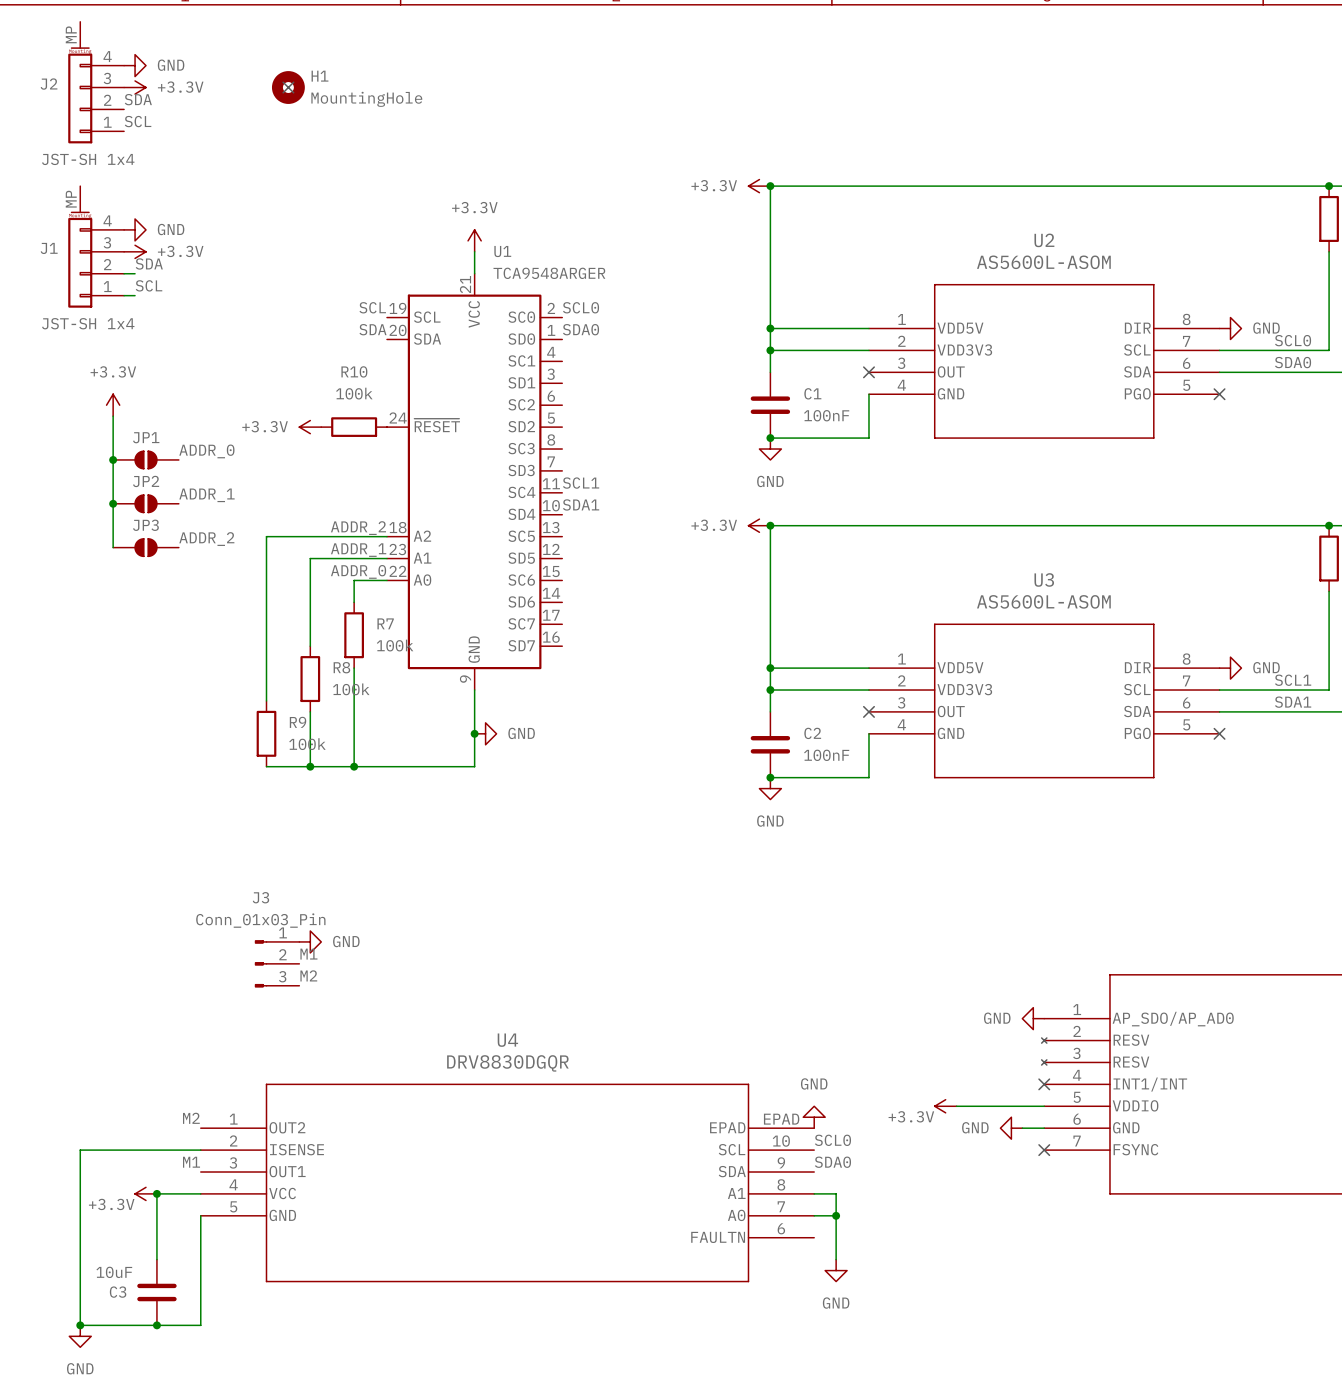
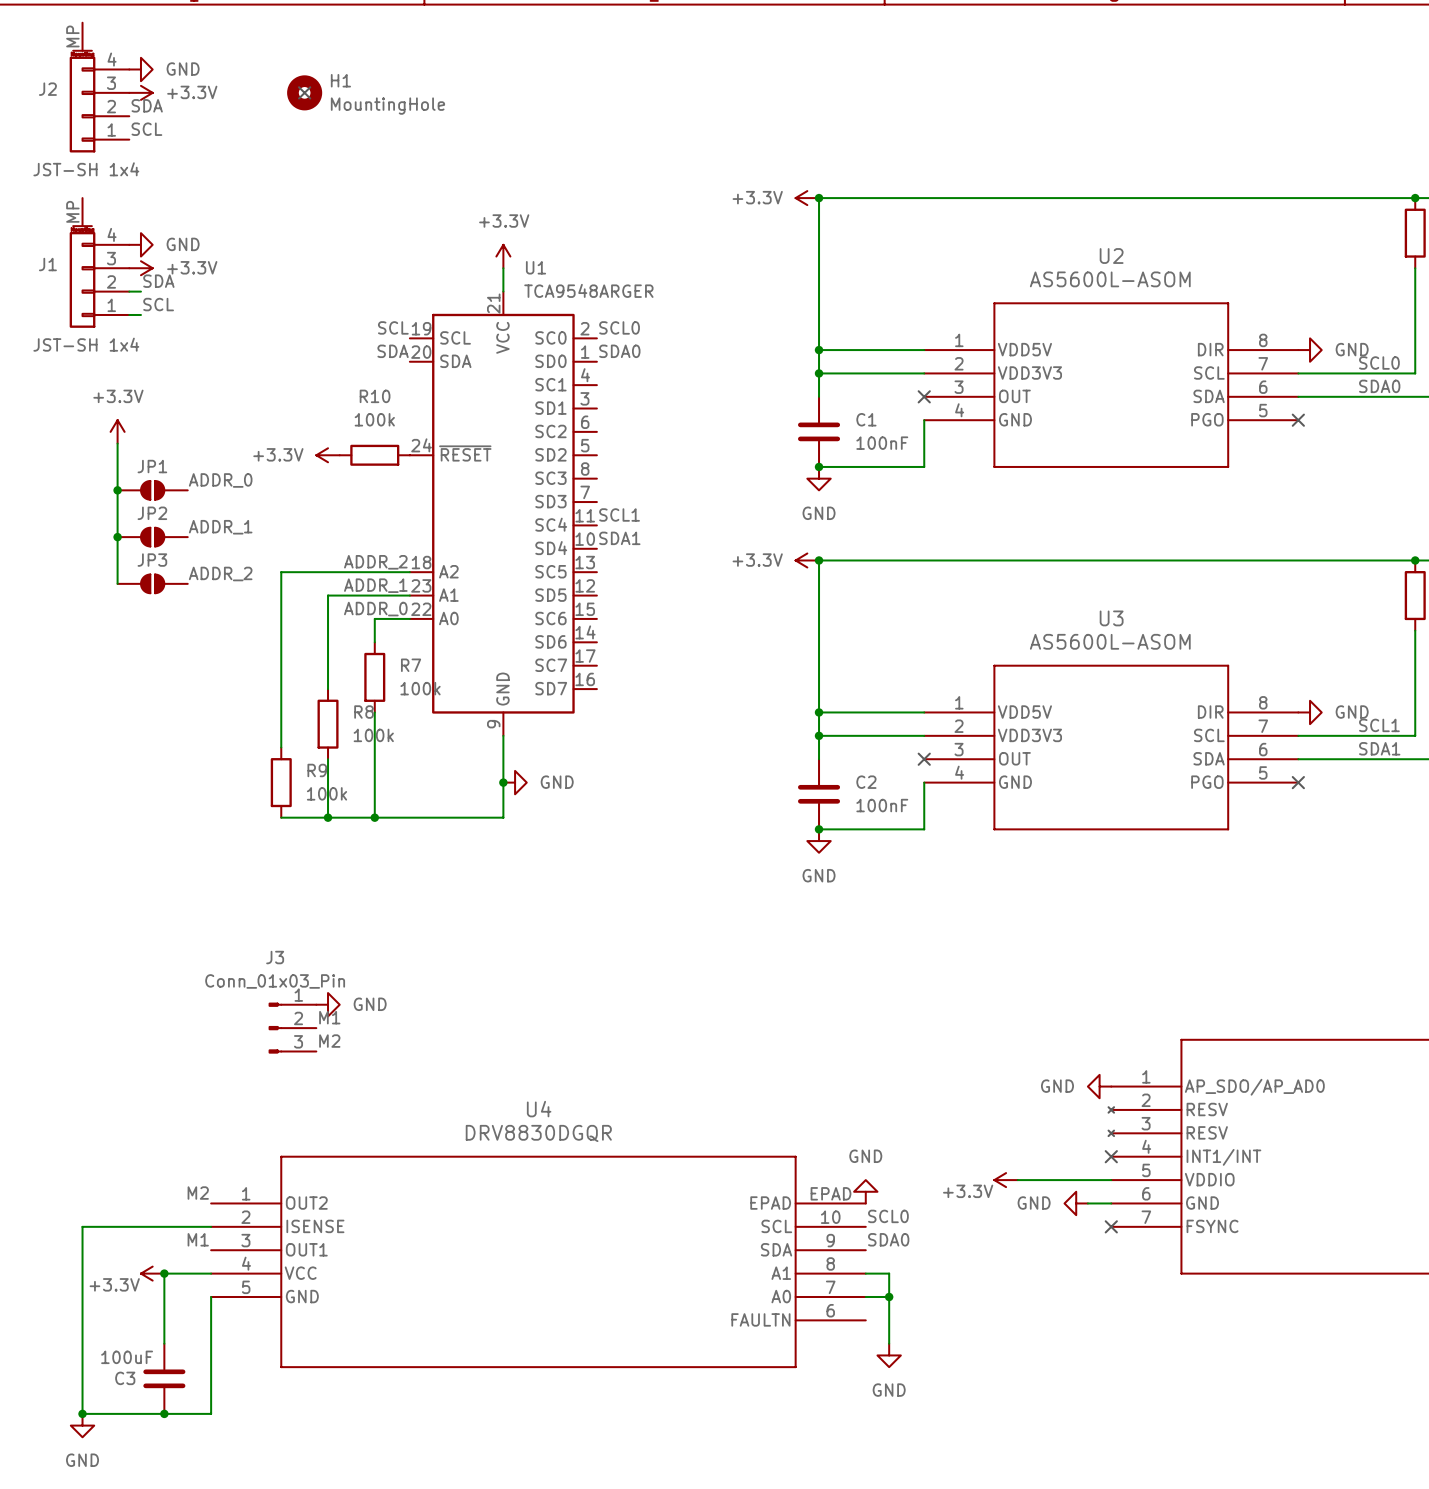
C3 value: 10uF (114, 1272) -> 100uF (127, 1357)

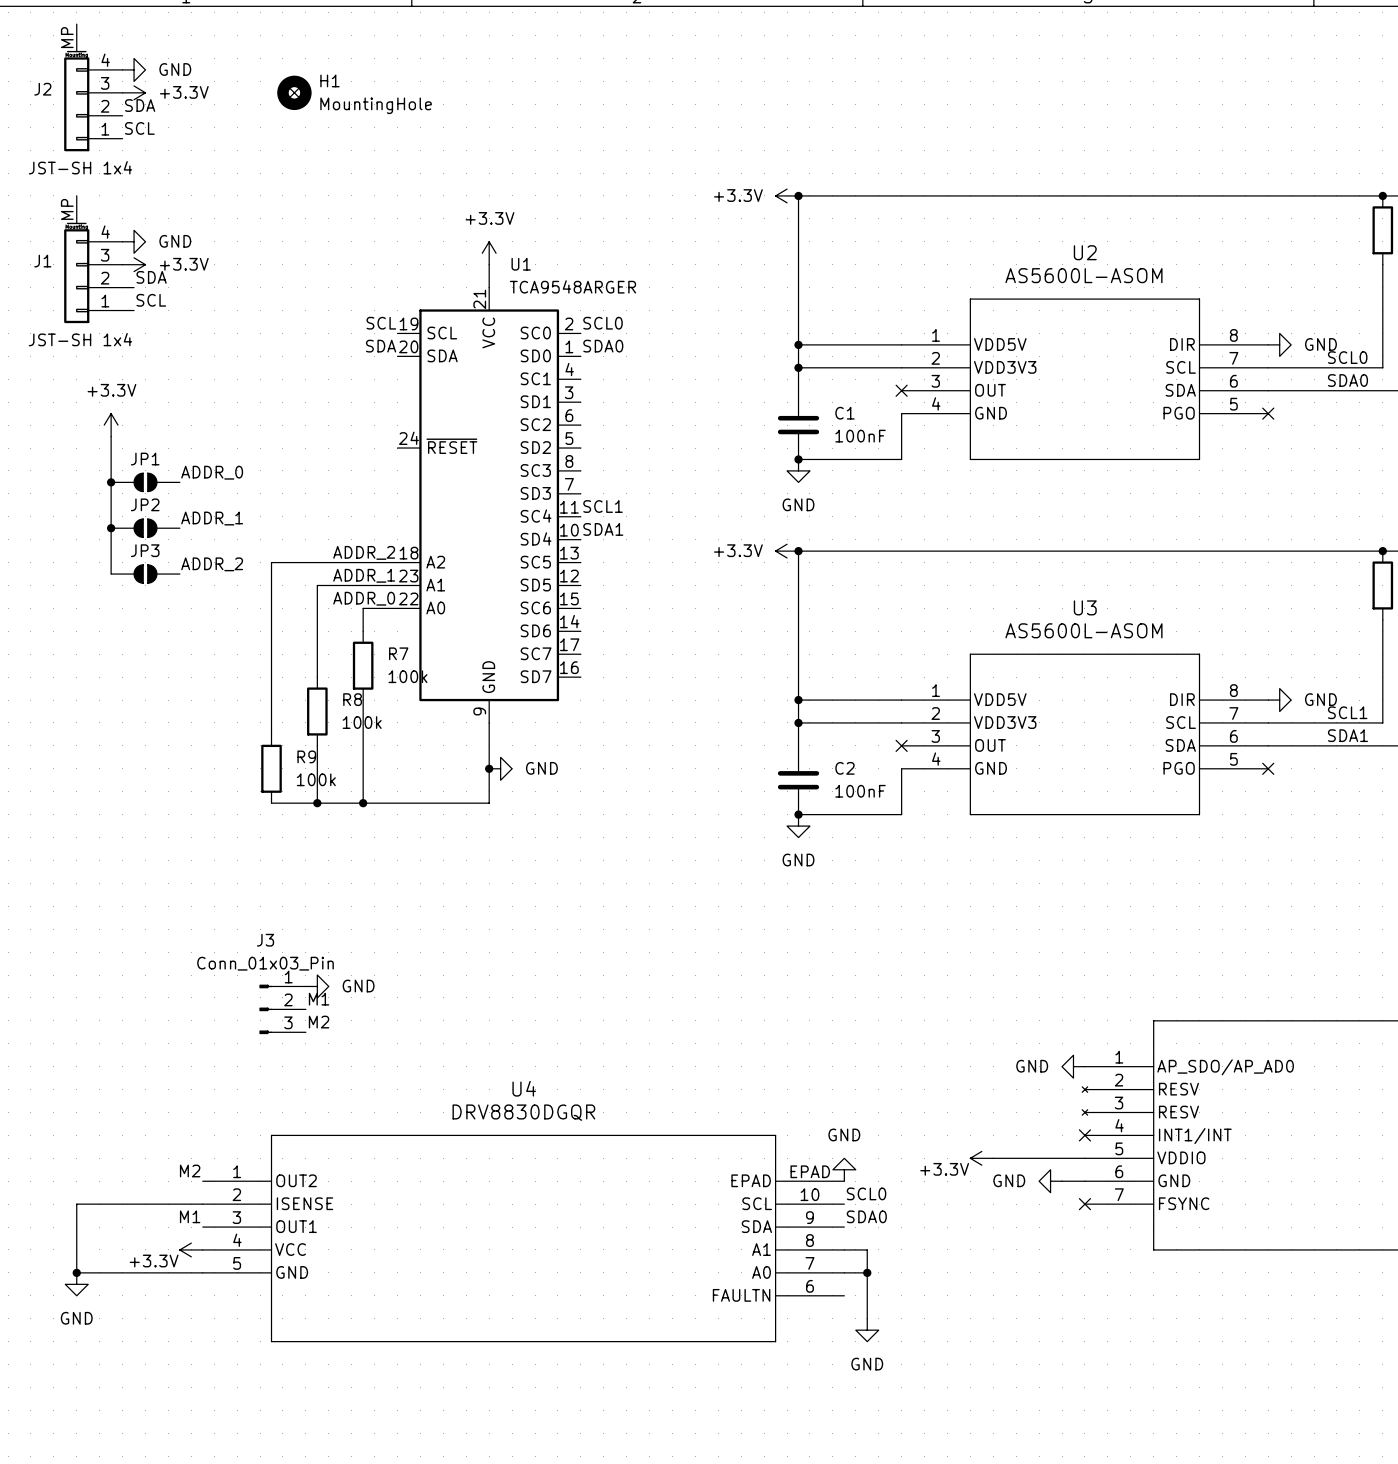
power symbol: +3.3V (328, 455) -> none
R10: 100k (374, 455) -> none
power symbol position: +3.3V (152, 1273) -> +3.3V (191, 1249)
junction: (164, 1273) -> none
wire: (211, 1273) (164, 1273) (164, 1343) -> none
wire: (82, 1296) (82, 1413) (211, 1413) (211, 1296) -> (76, 1272) (202, 1272)
junction: none -> (76, 1272)
C3: 100uF (164, 1378) -> none
junction: (82, 1413) -> none
junction: (164, 1413) -> none
power symbol position: GND (82, 1425) -> GND (76, 1284)

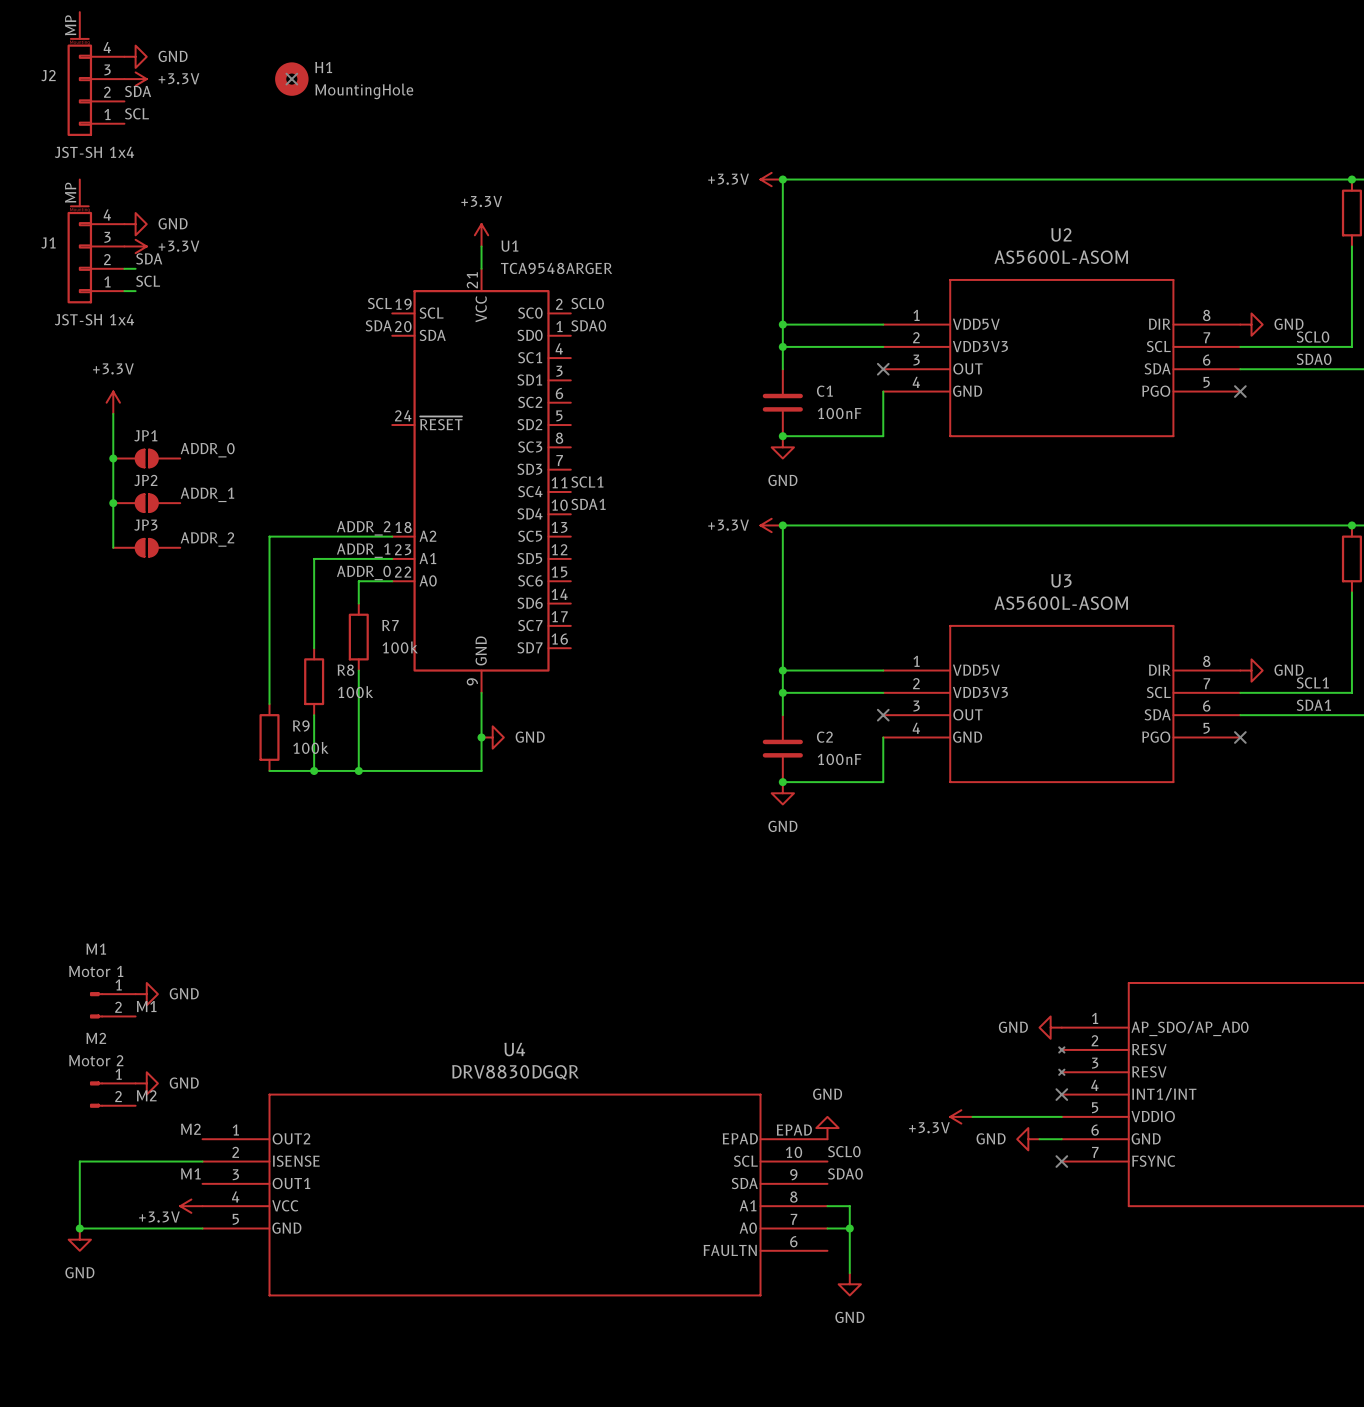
power symbol: GND (317, 986) -> none
label position: M1 (319, 999) -> M1 (146, 1006)
J3: Conn_01x03_Pin (282, 1009) -> none
label position: M2 (319, 1022) -> M2 (146, 1095)
power symbol: none -> GND (146, 994)
M1: none -> Motor 1 (112, 1005)
power symbol: none -> GND (146, 1083)
M2: none -> Motor 2 (112, 1094)

